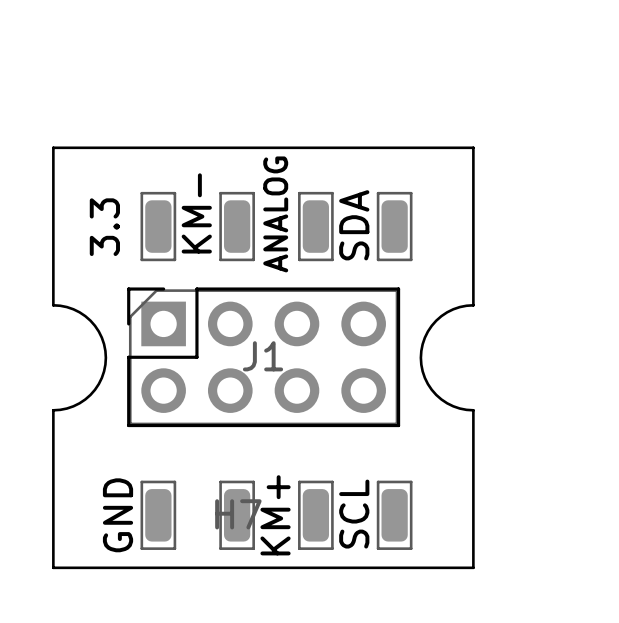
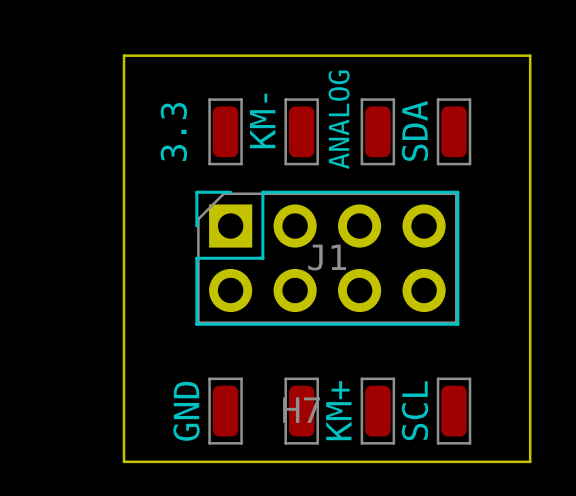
board edge: (53, 305) (73, 309) (90, 320) (101, 337) (105, 357) (101, 377) (90, 394) (73, 406) (53, 410) -> (124, 207) (124, 309)
board edge: (473, 305) (453, 309) (436, 320) (424, 337) (420, 357) (424, 377) (436, 394) (453, 406) (473, 410) -> (530, 207) (530, 309)

